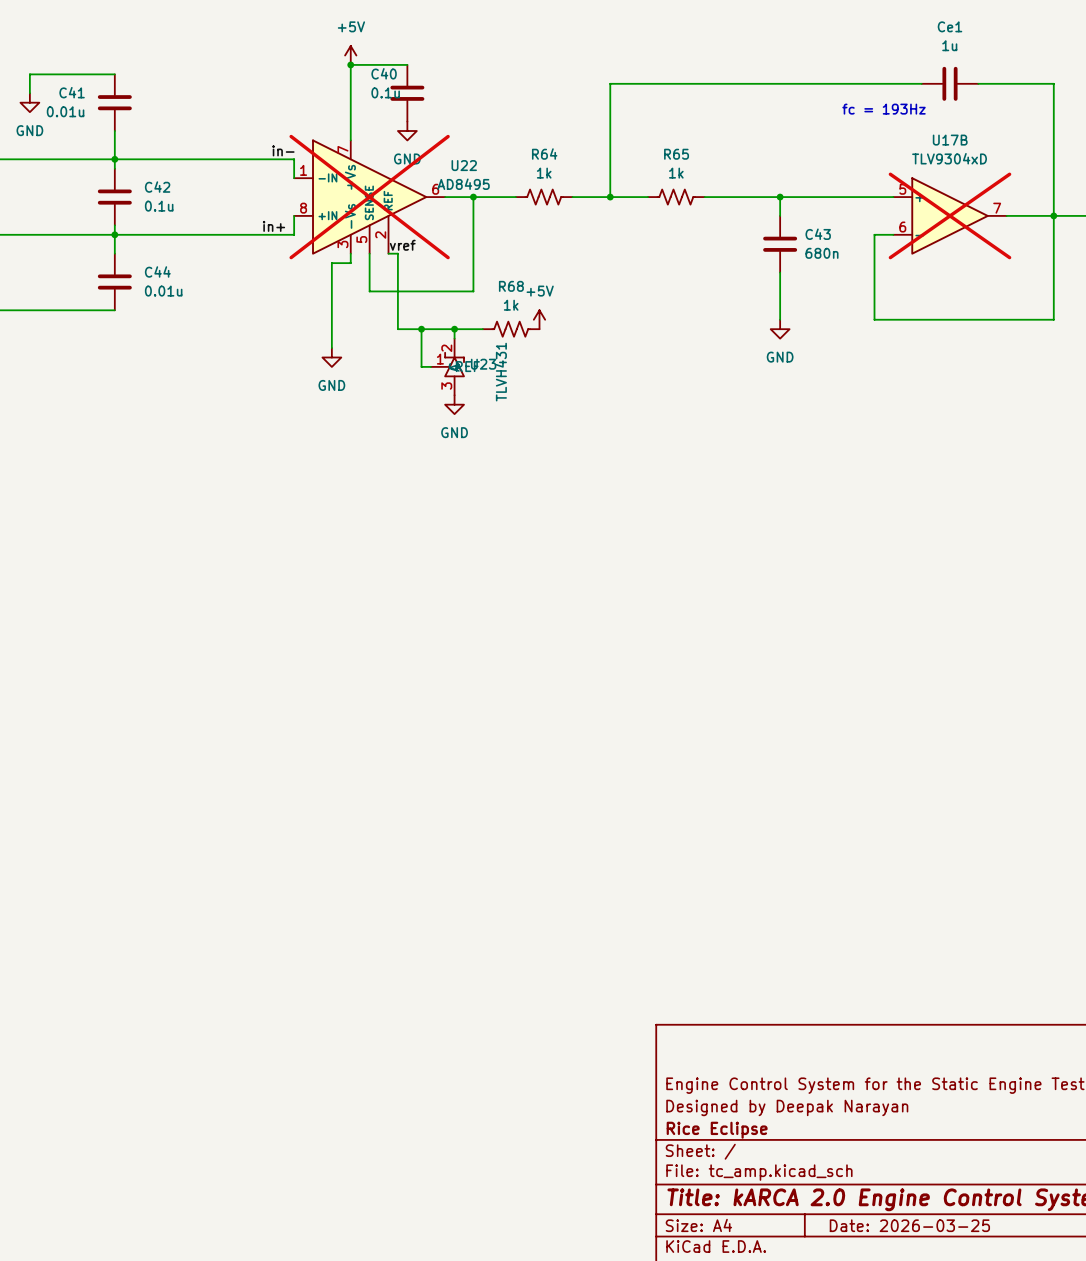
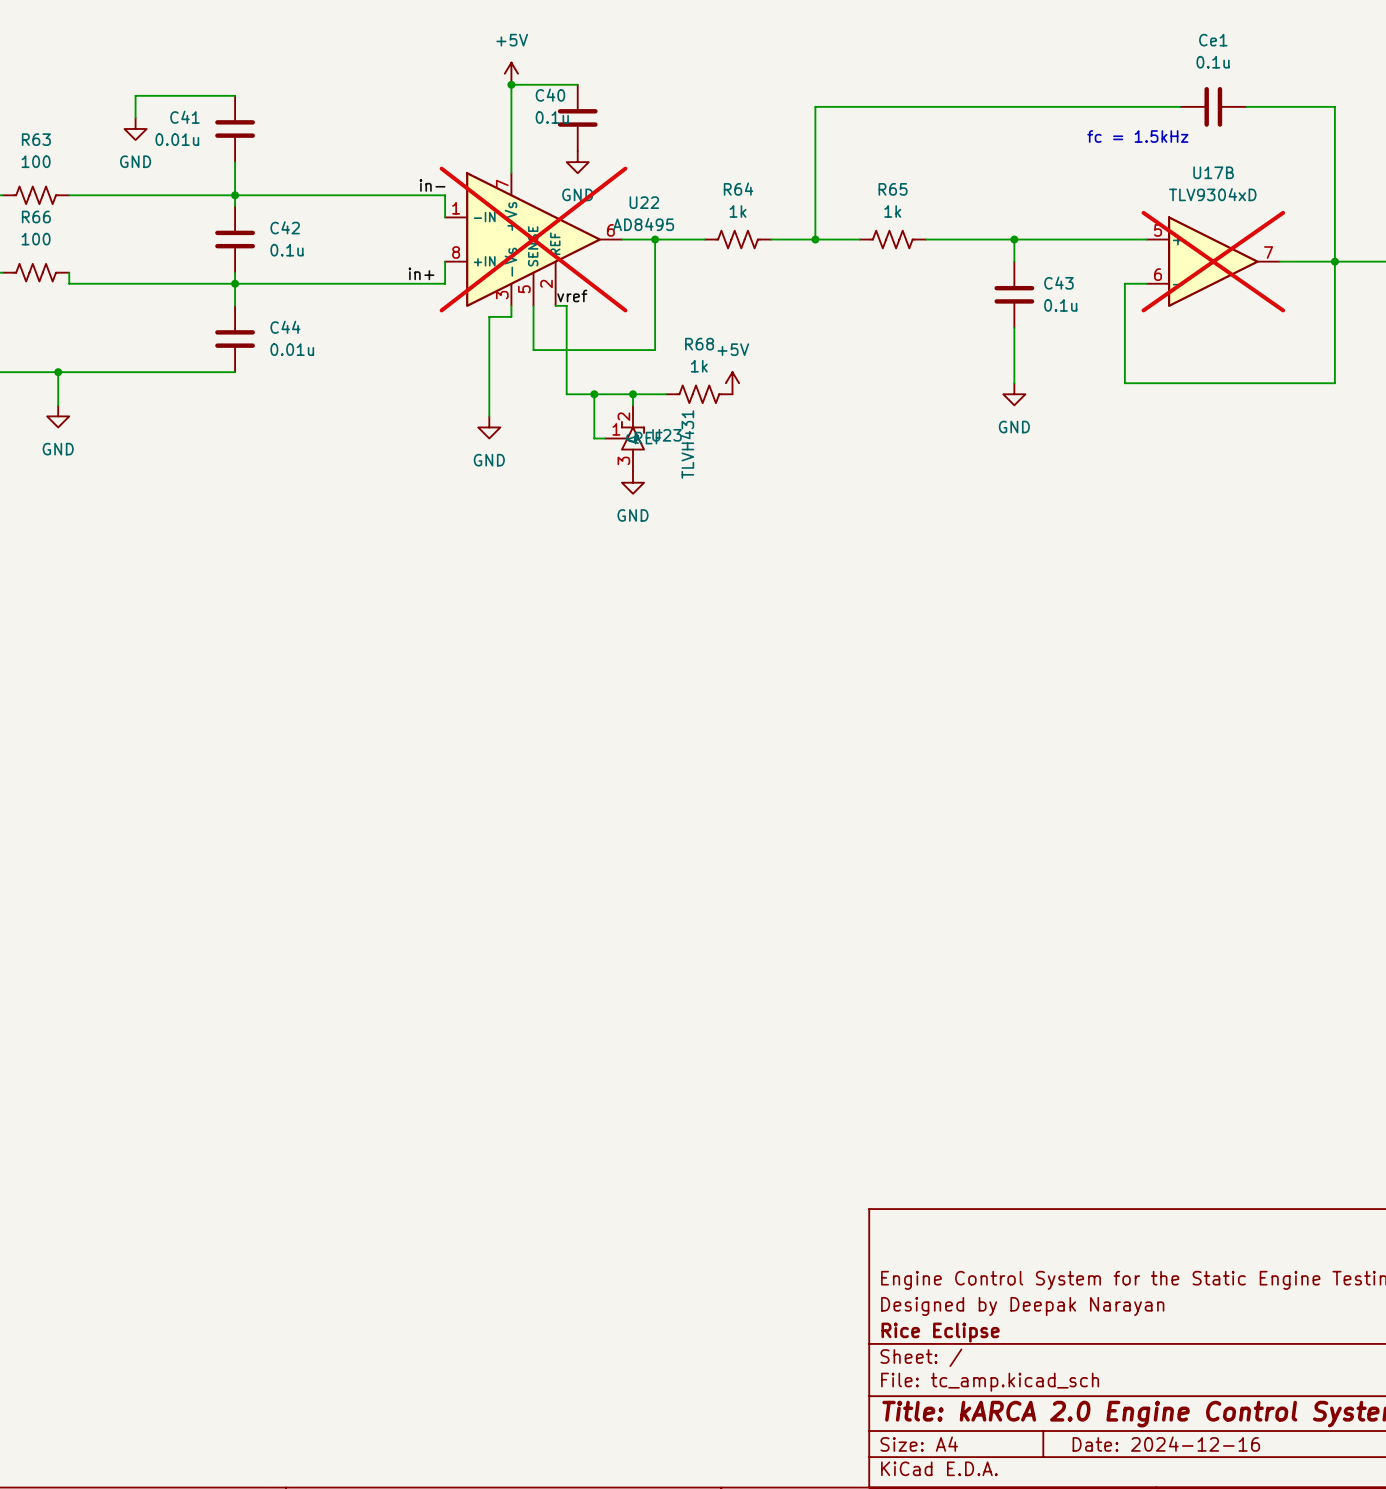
Ce1 value: 1u (949, 45) -> 0.1u (1213, 62)
text: fc = 193Hz (884, 109) -> fc = 1.5kHz (1137, 136)
C43 value: 680n (821, 253) -> 0.1u (1060, 305)
title block: Date: 2026-03-25 (909, 1225) -> Date: 2024-12-16 (1166, 1444)

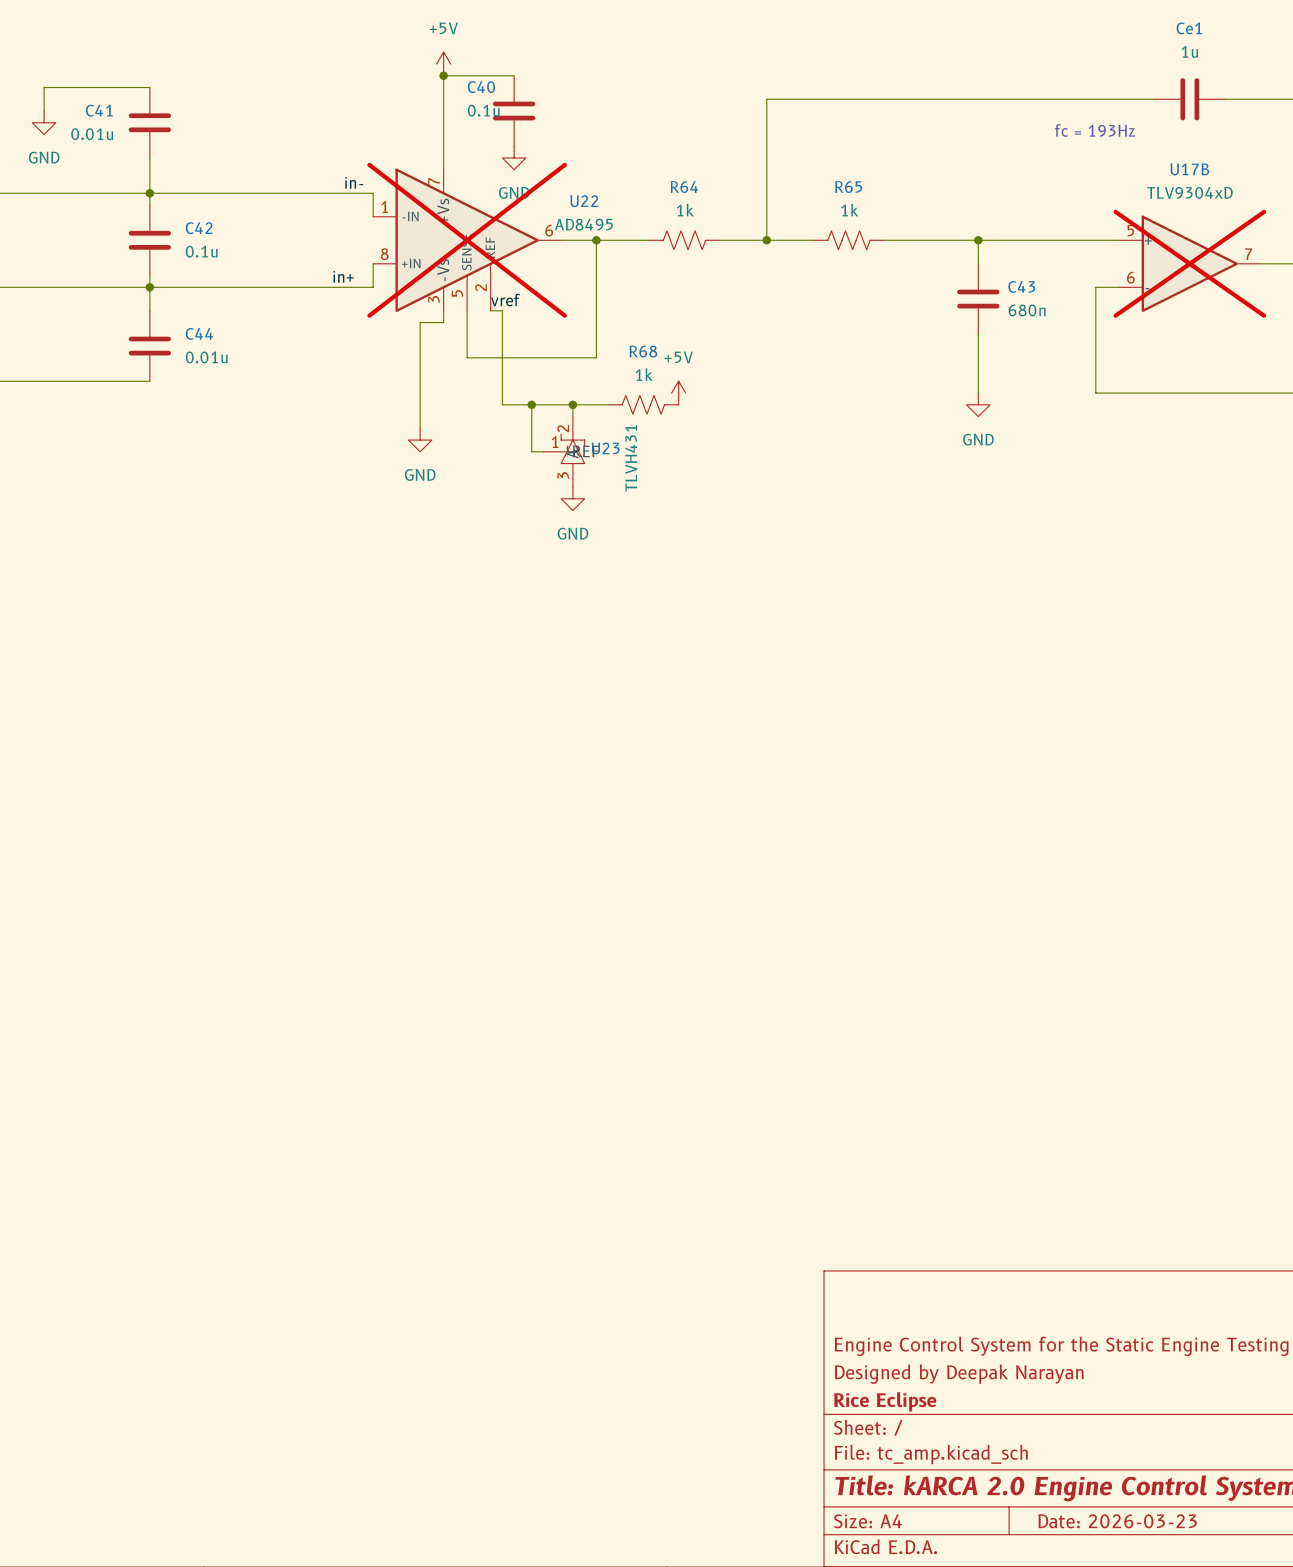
Ce1 value: 0.1u (1213, 62) -> 1u (1189, 51)
text: fc = 1.5kHz (1137, 136) -> fc = 193Hz (1095, 130)
C43 value: 0.1u (1060, 305) -> 680n (1027, 310)
title block: Date: 2024-12-16 (1166, 1444) -> Date: 2026-03-23 (1117, 1521)

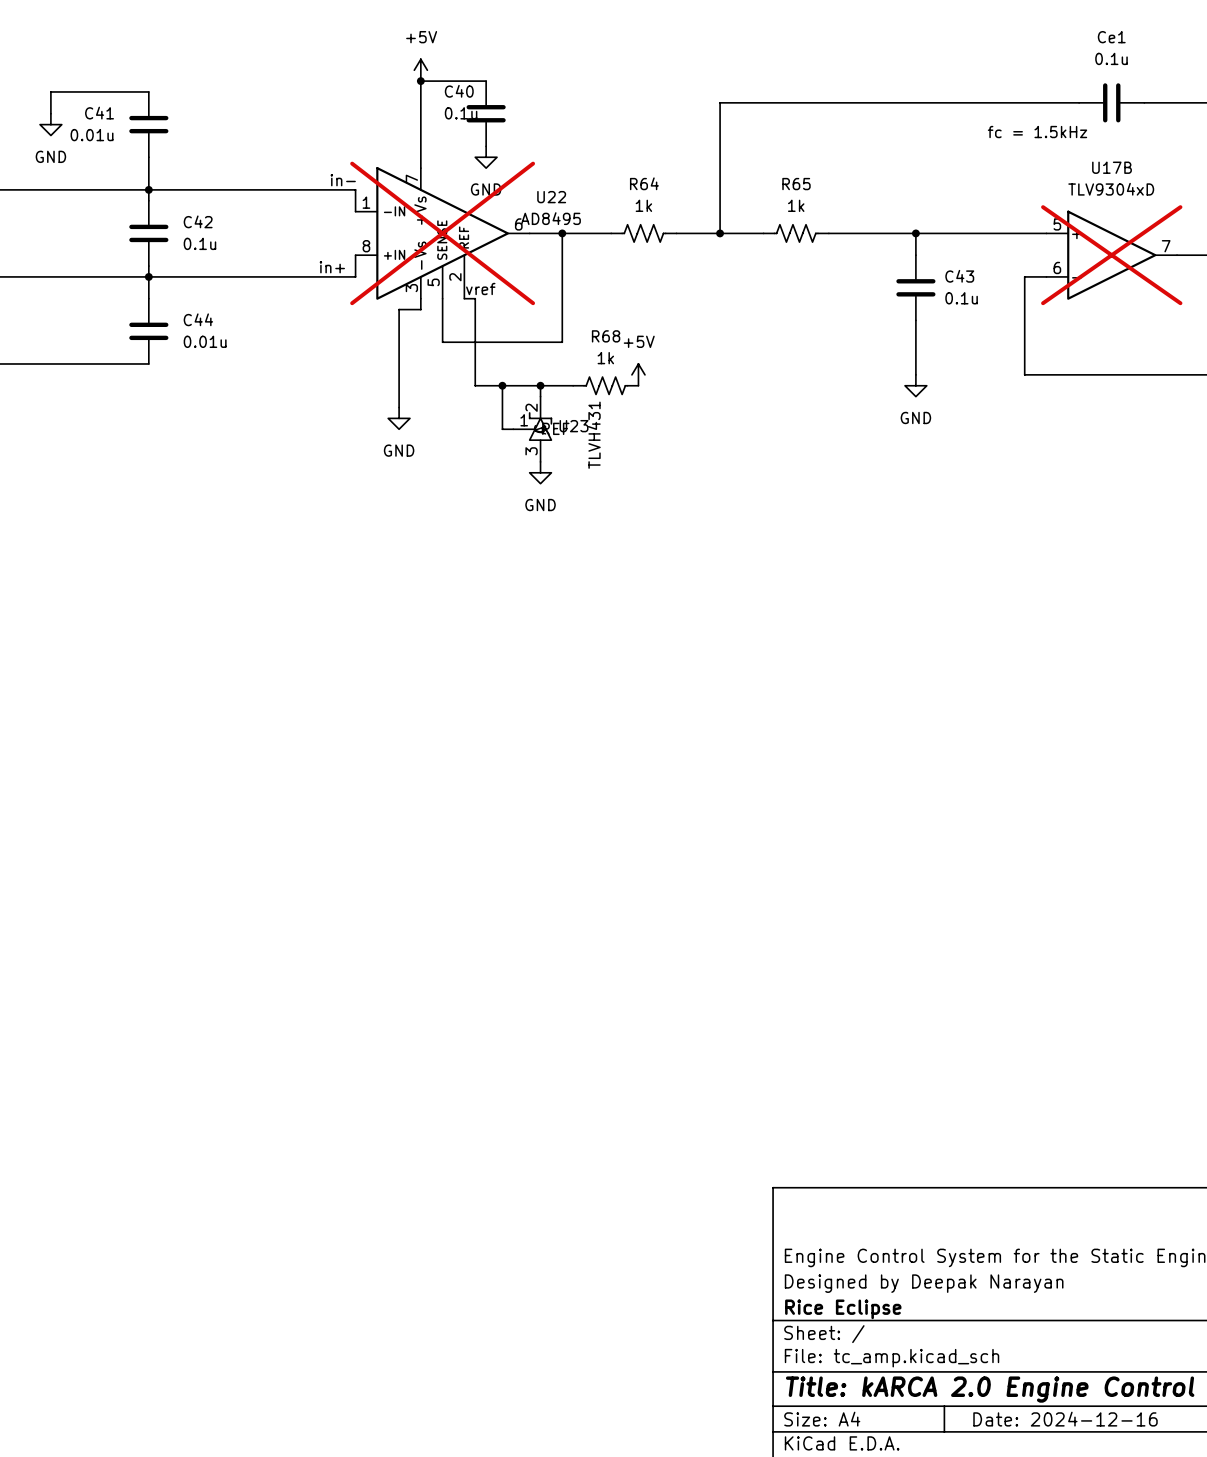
Ce1 value: 1u (1189, 51) -> 0.1u (1111, 58)
text: fc = 193Hz (1095, 130) -> fc = 1.5kHz (1037, 132)
C43 value: 680n (1027, 310) -> 0.1u (961, 298)
title block: Date: 2026-03-23 (1117, 1521) -> Date: 2024-12-16 (1065, 1419)

